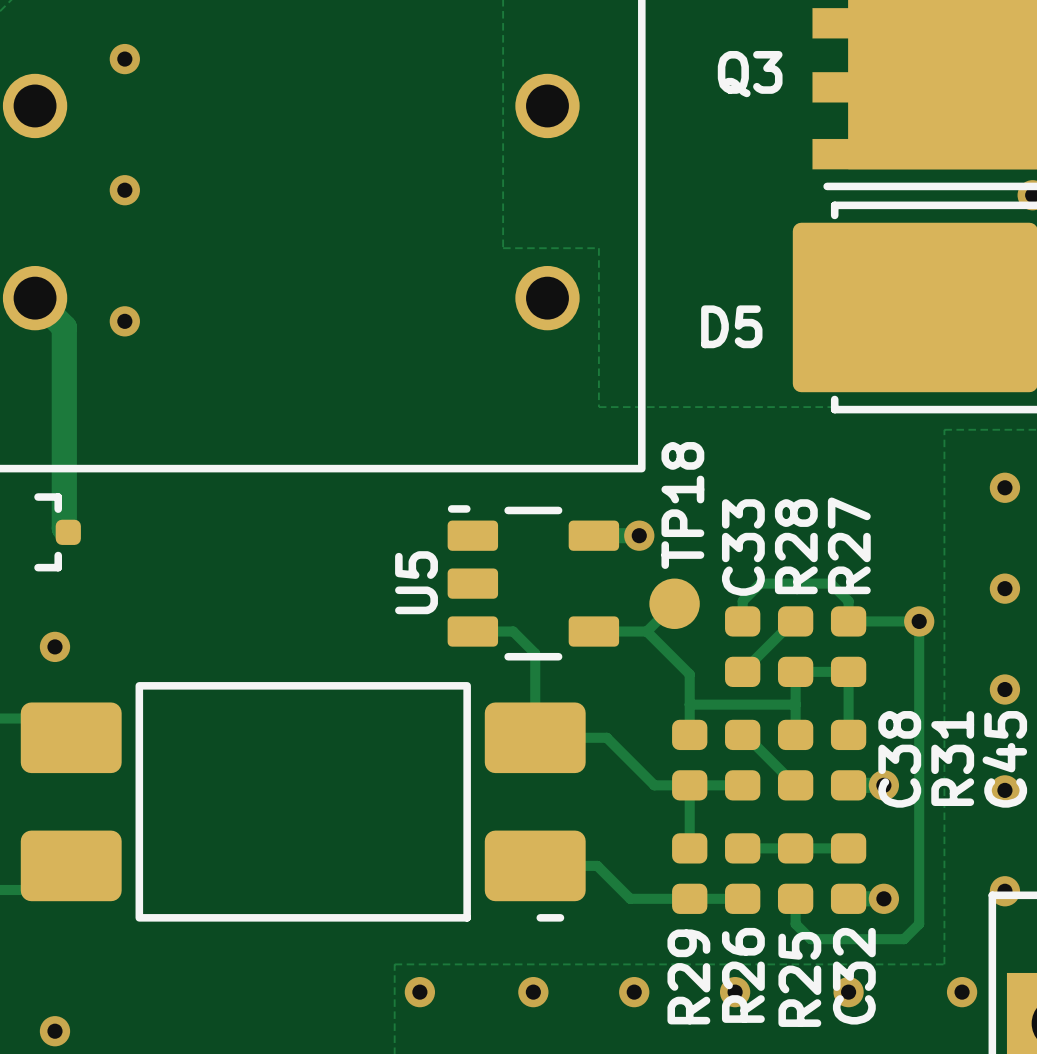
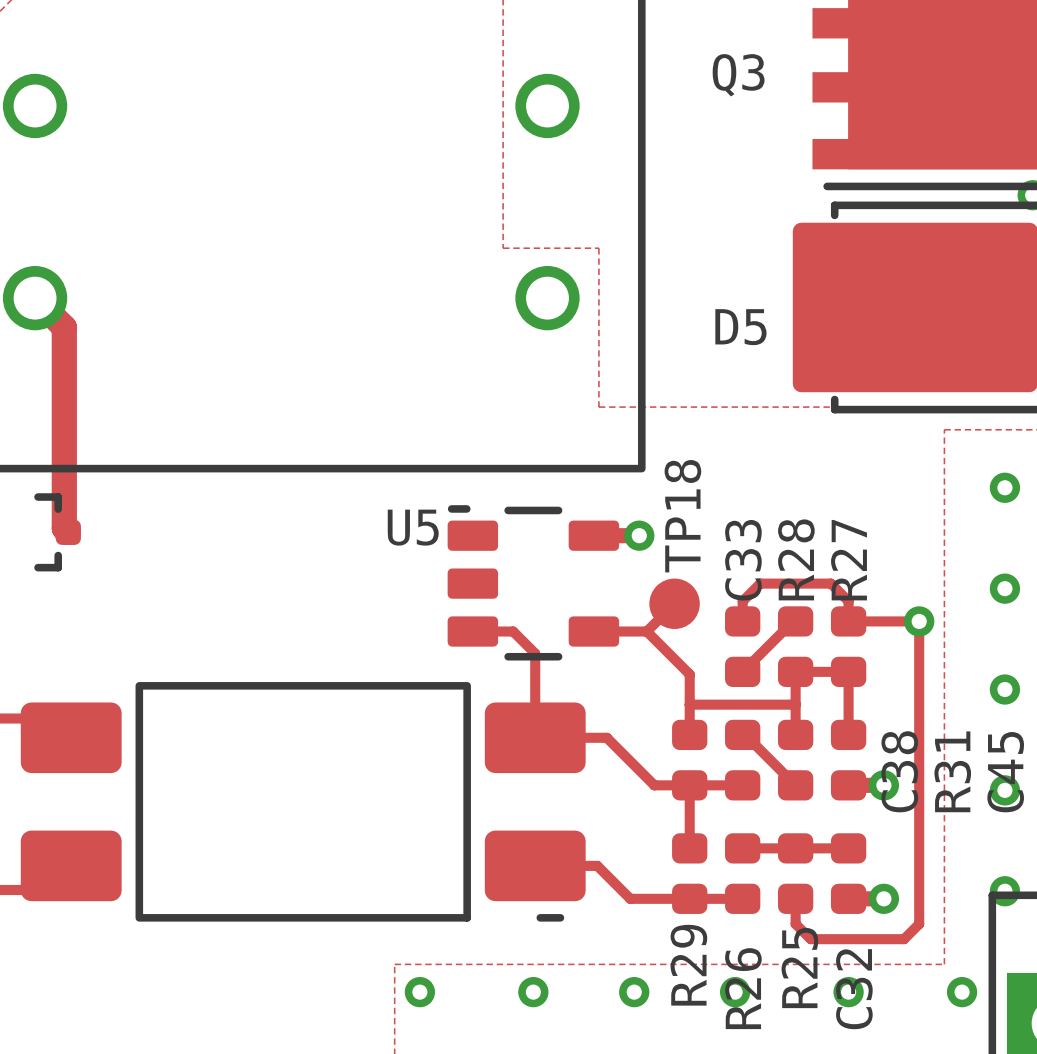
via: (124, 59) -> none
via: (124, 190) -> none
via: (124, 321) -> none
U5 name rotation: 0° (416, 582) -> 90° clockwise (413, 527)
via: (54, 646) -> none
via: (54, 1031) -> none

